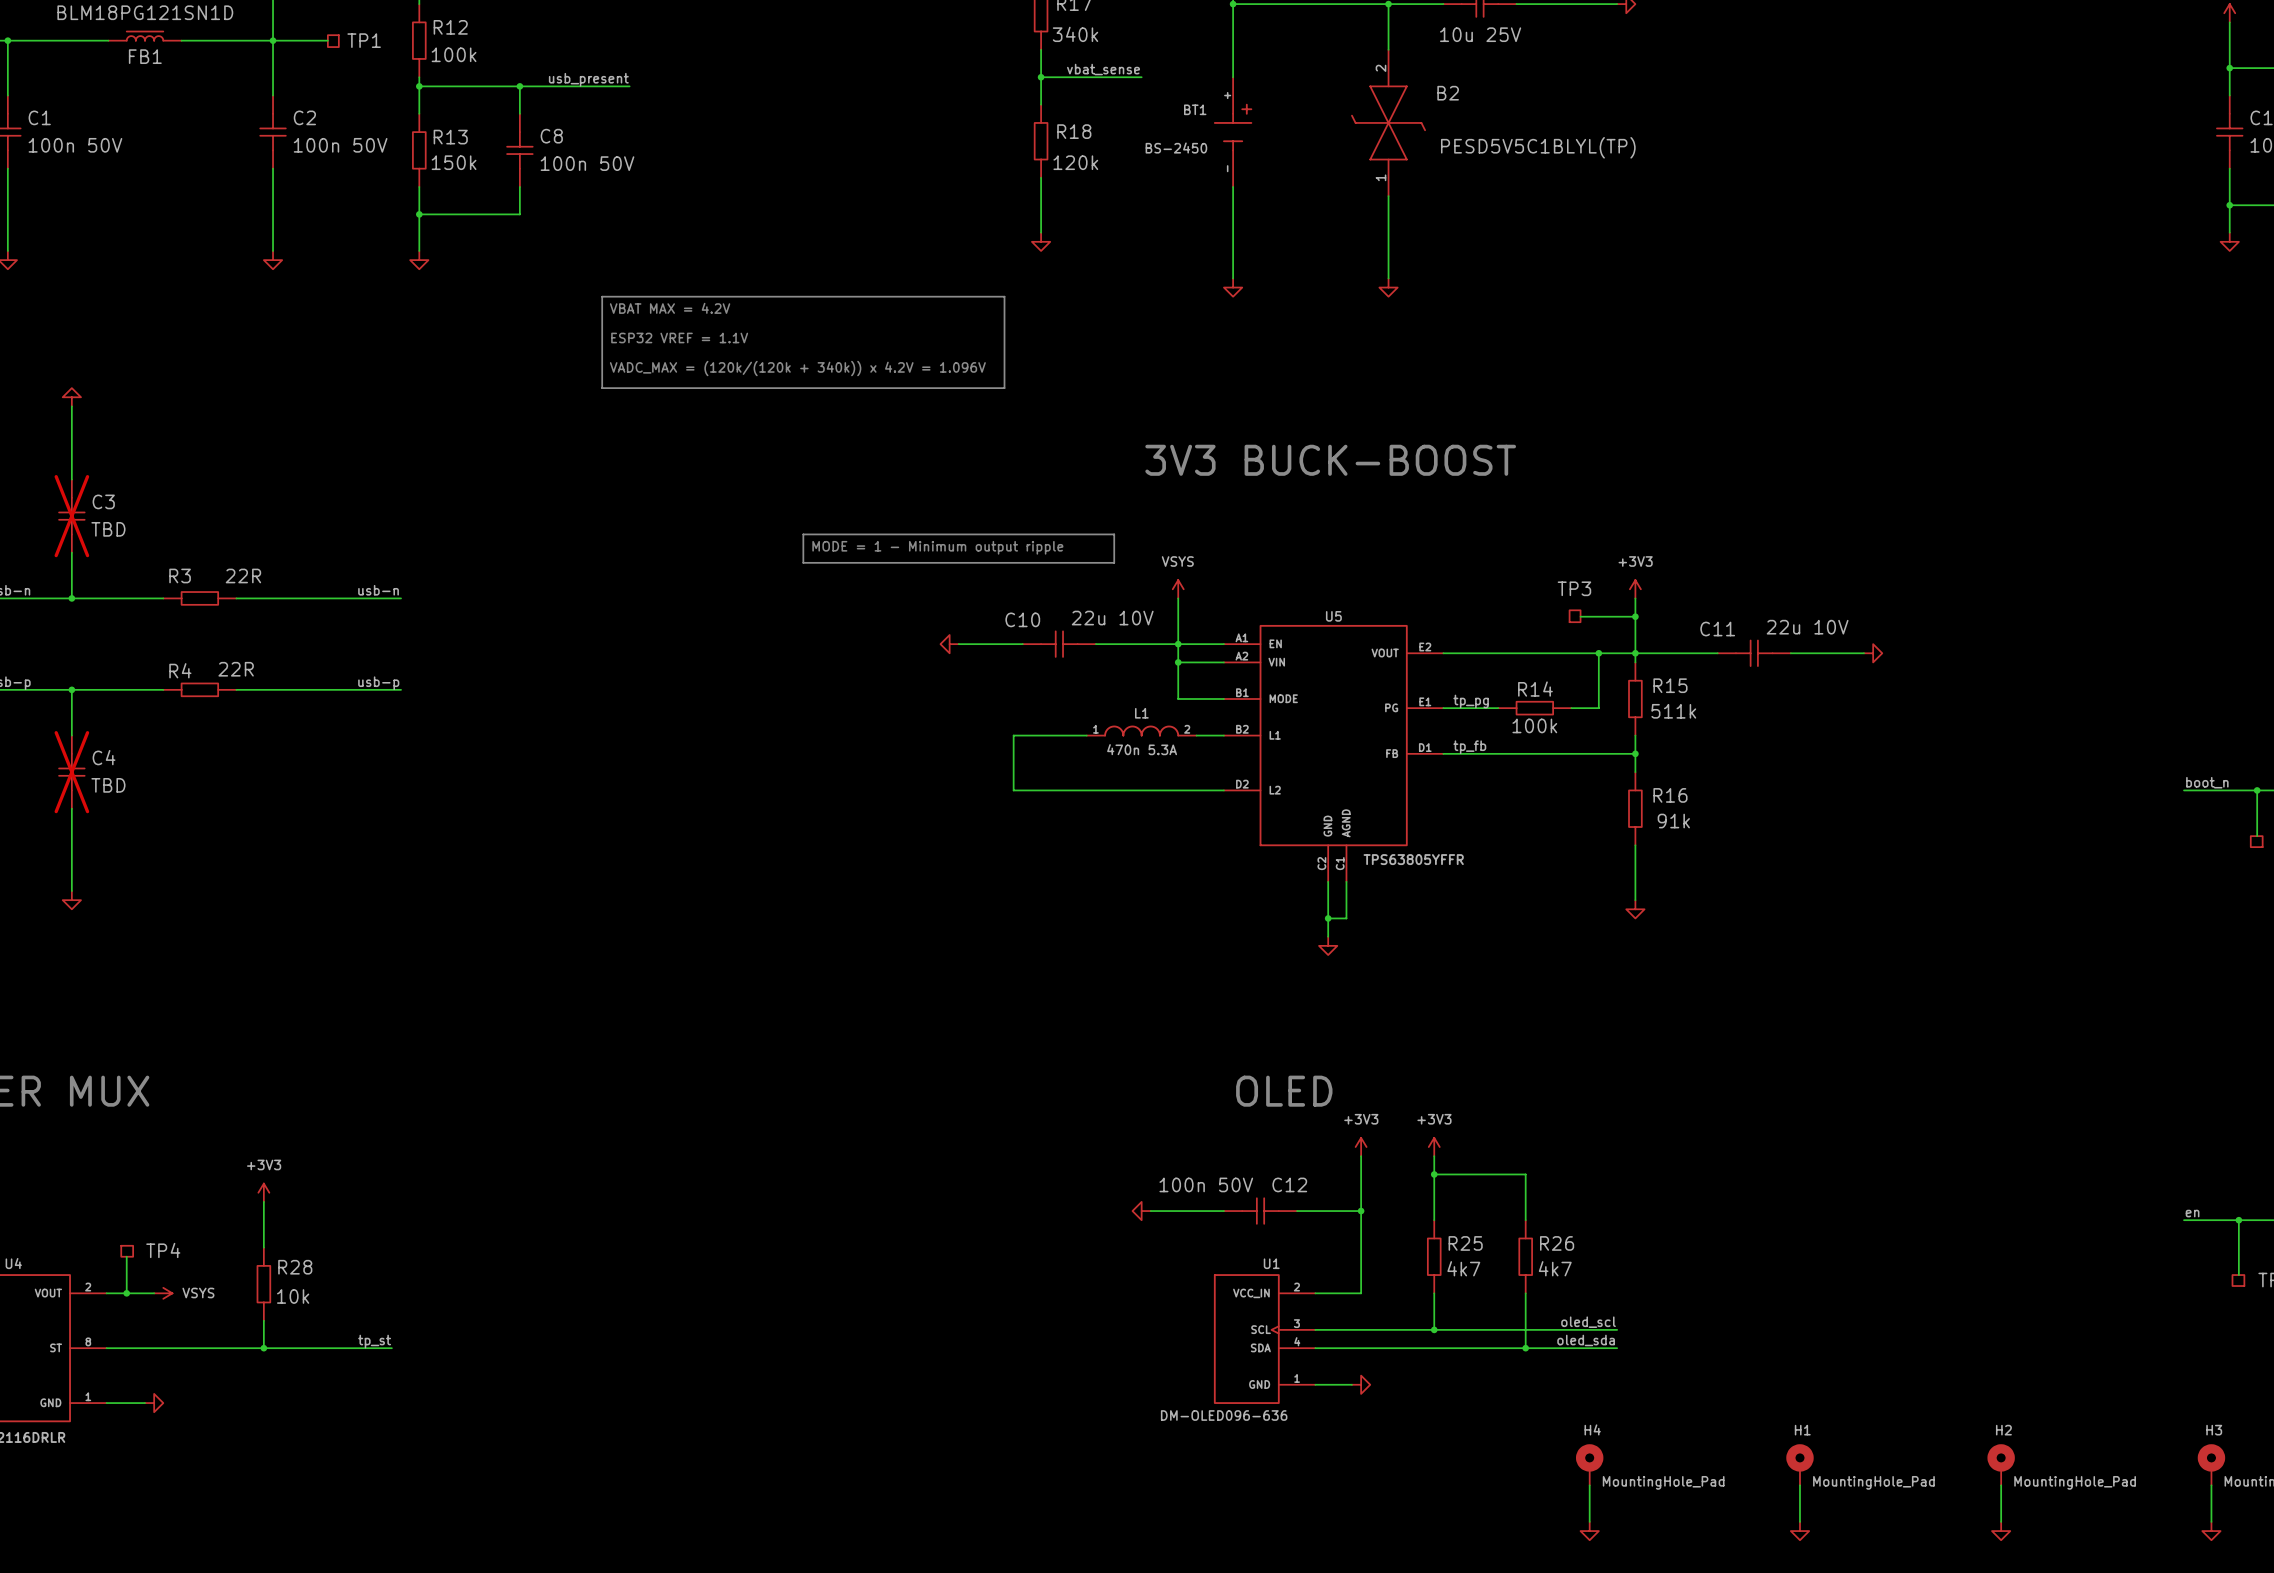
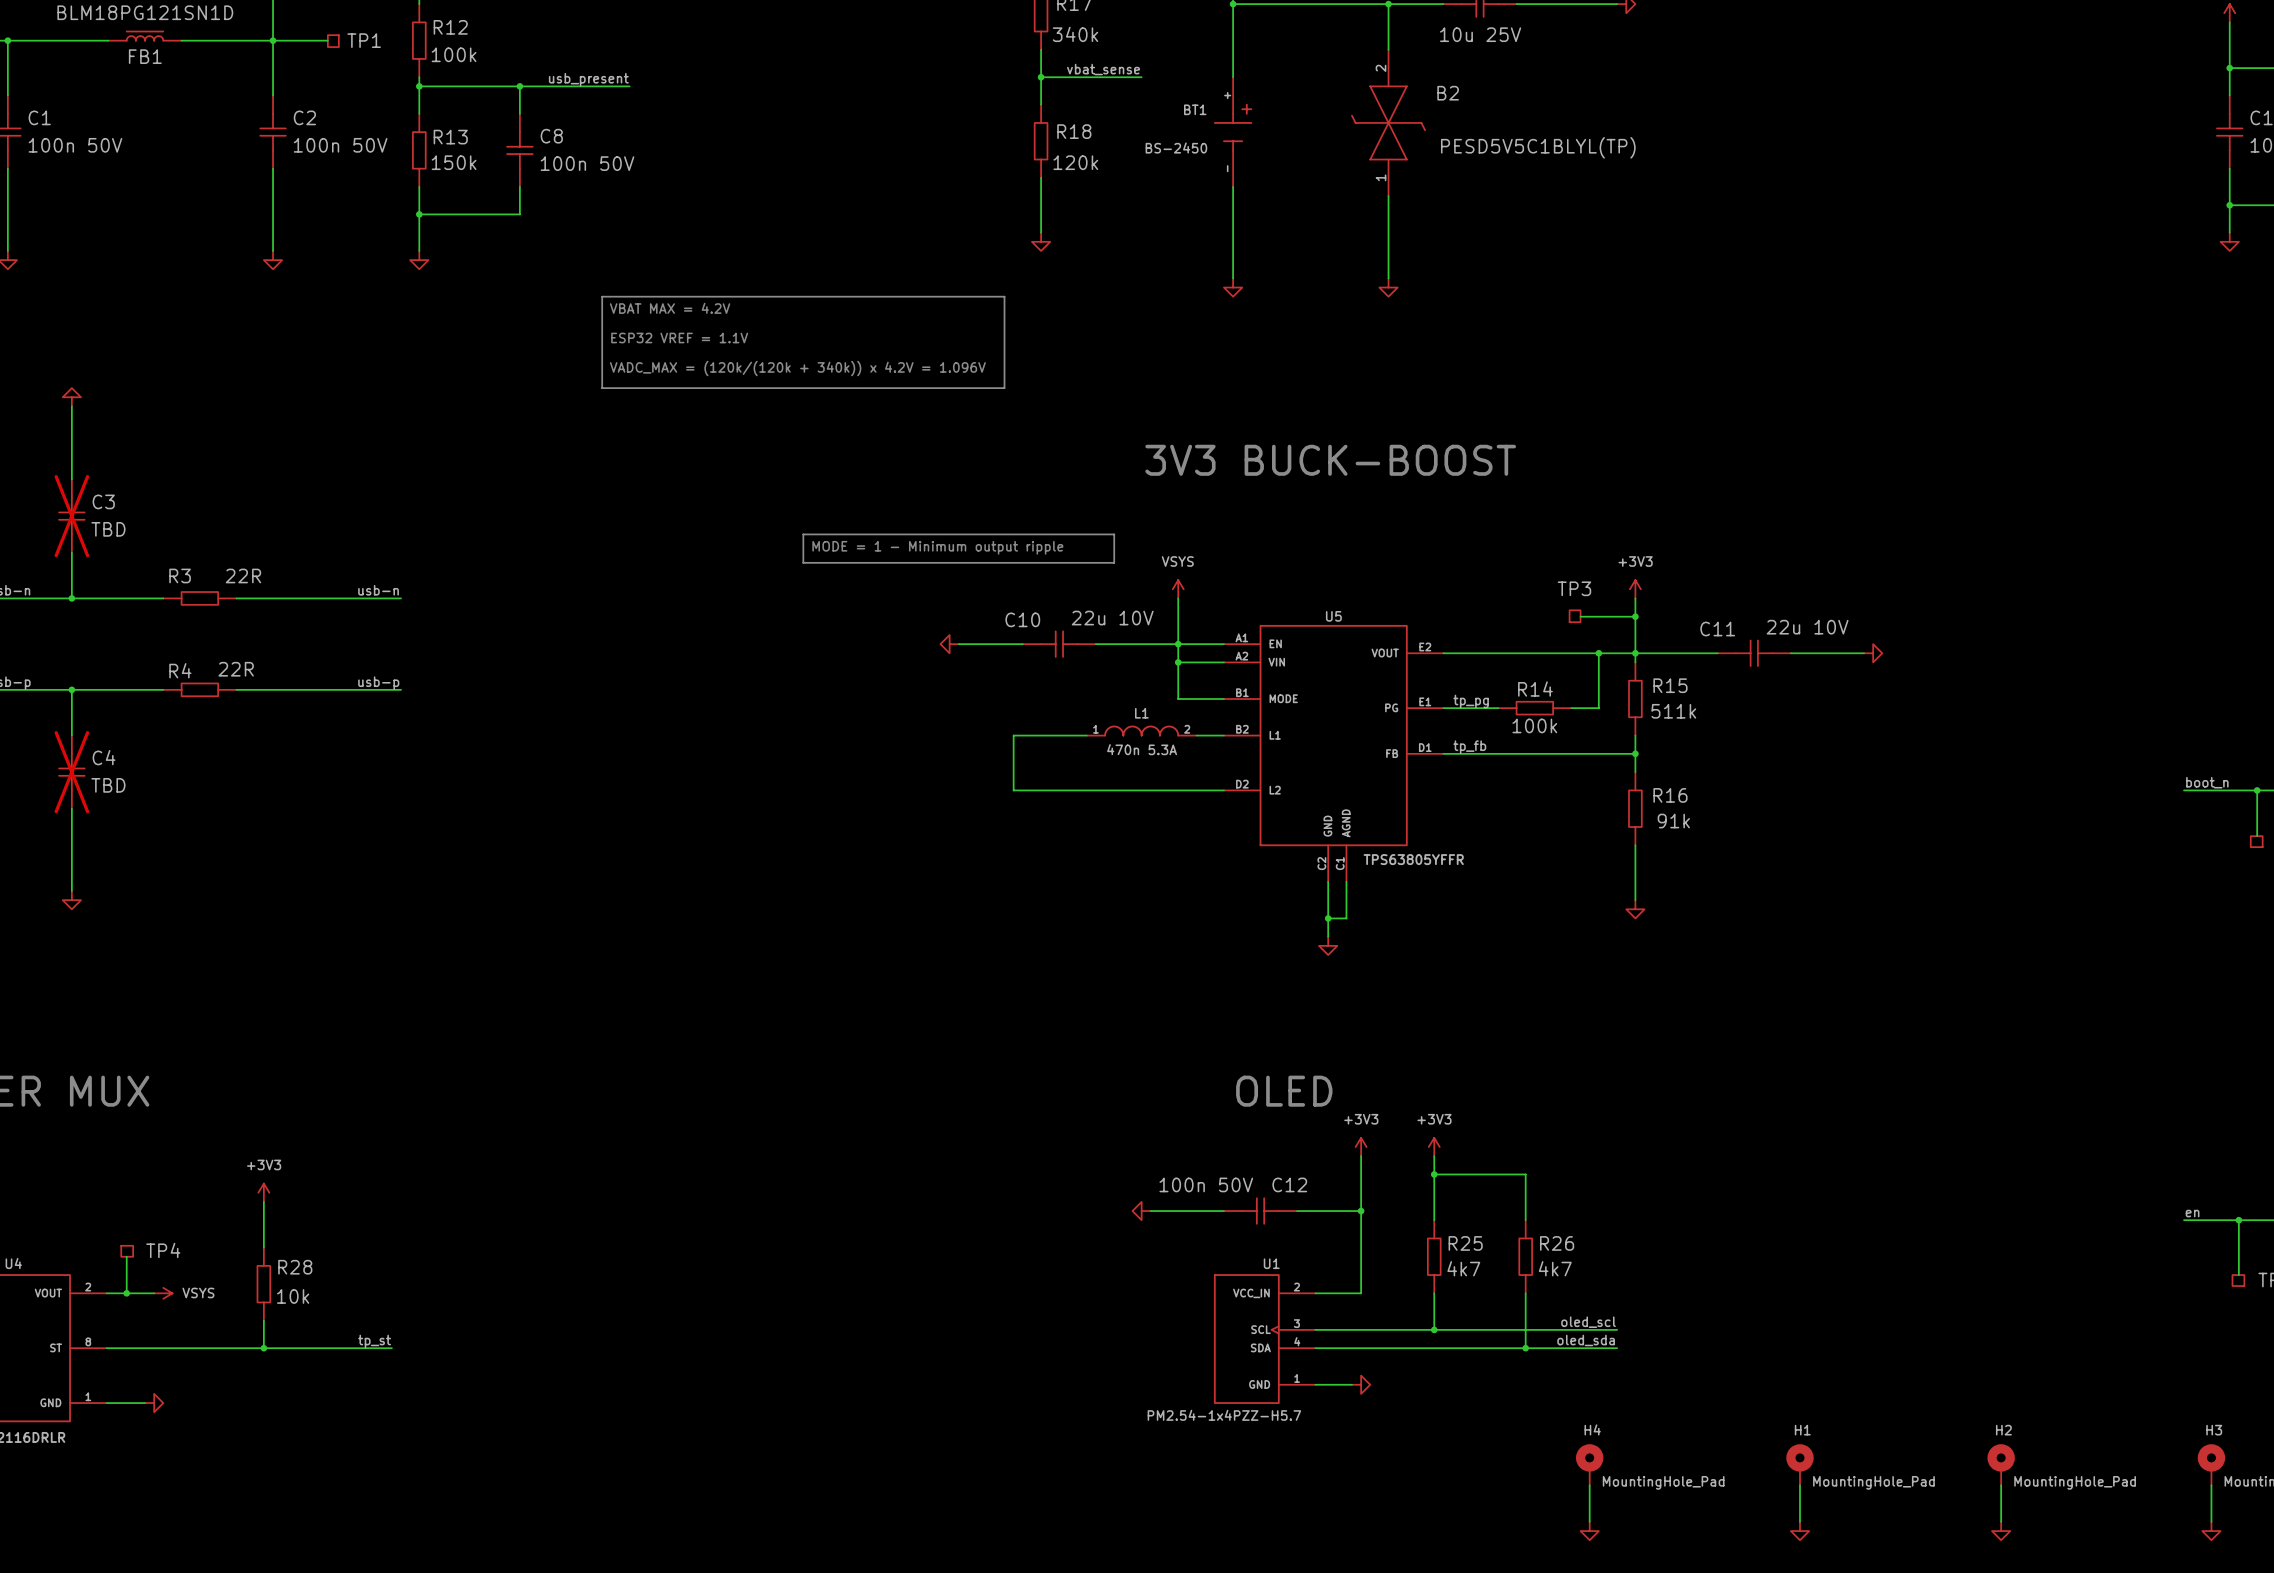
U1 value: DM-OLED096-636 (1224, 1415) -> PM2.54-1x4PZZ-H5.7 (1224, 1415)

